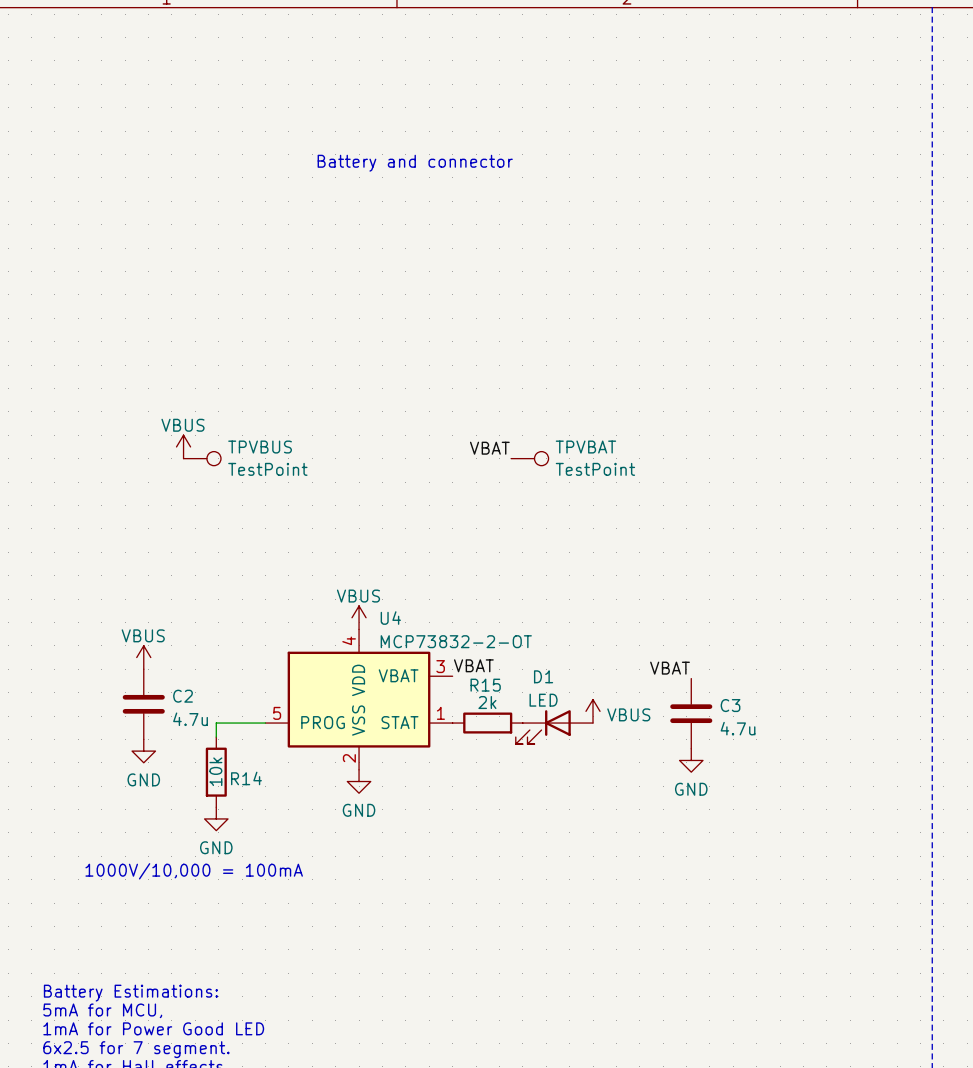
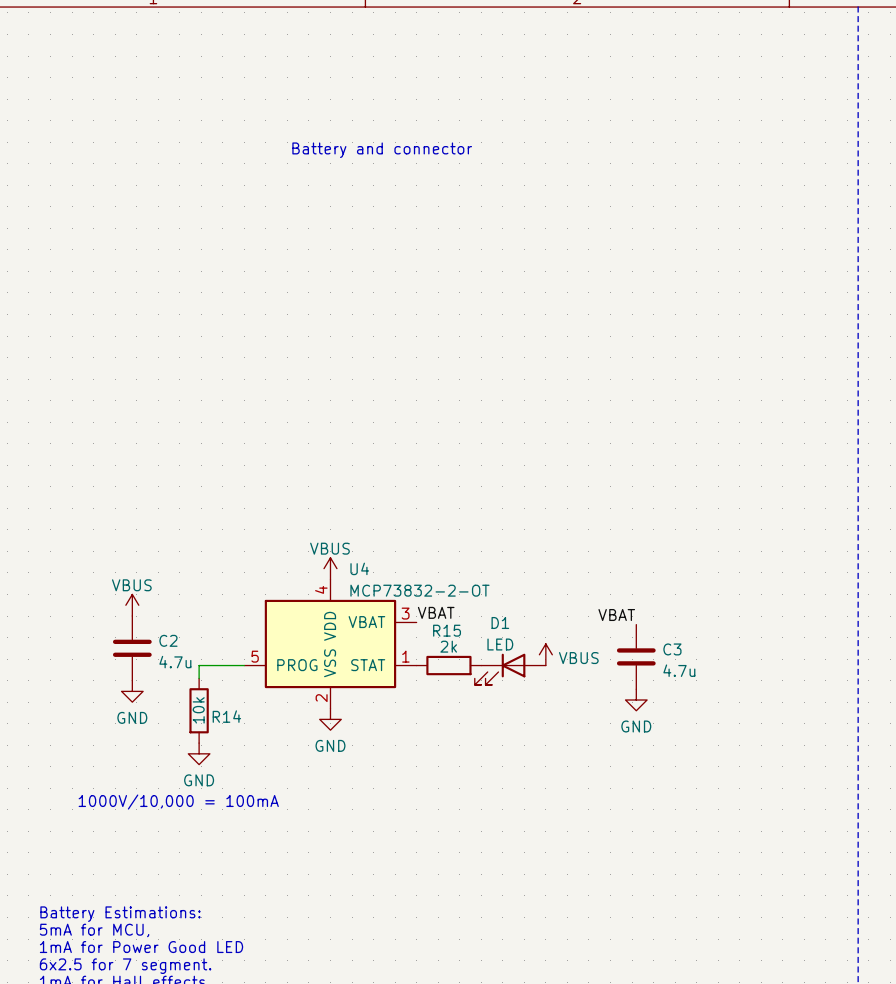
power symbol: VBUS (183, 446) -> none
label: VBAT (489, 448) -> none
TPVBUS: TestPoint (202, 458) -> none
TPVBAT: TestPoint (529, 458) -> none

